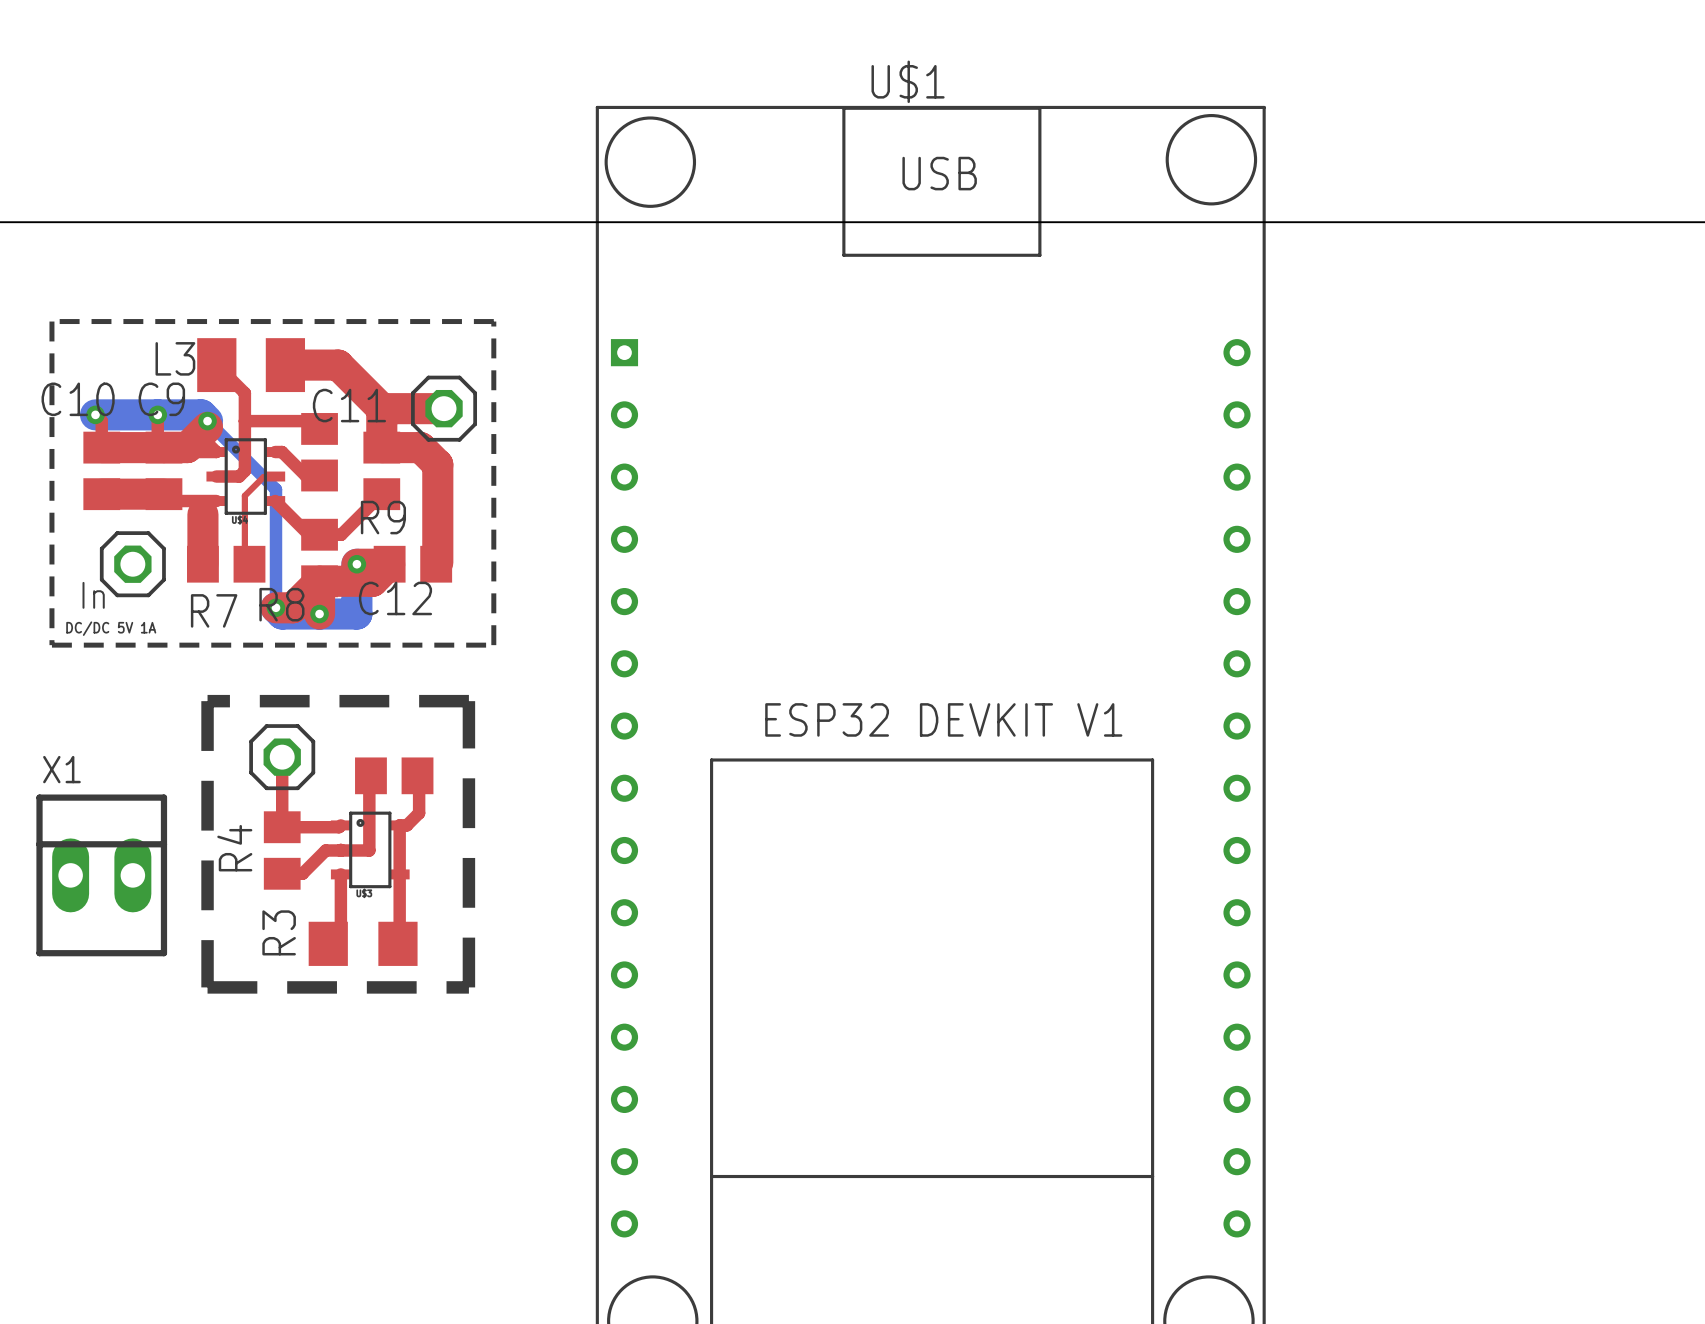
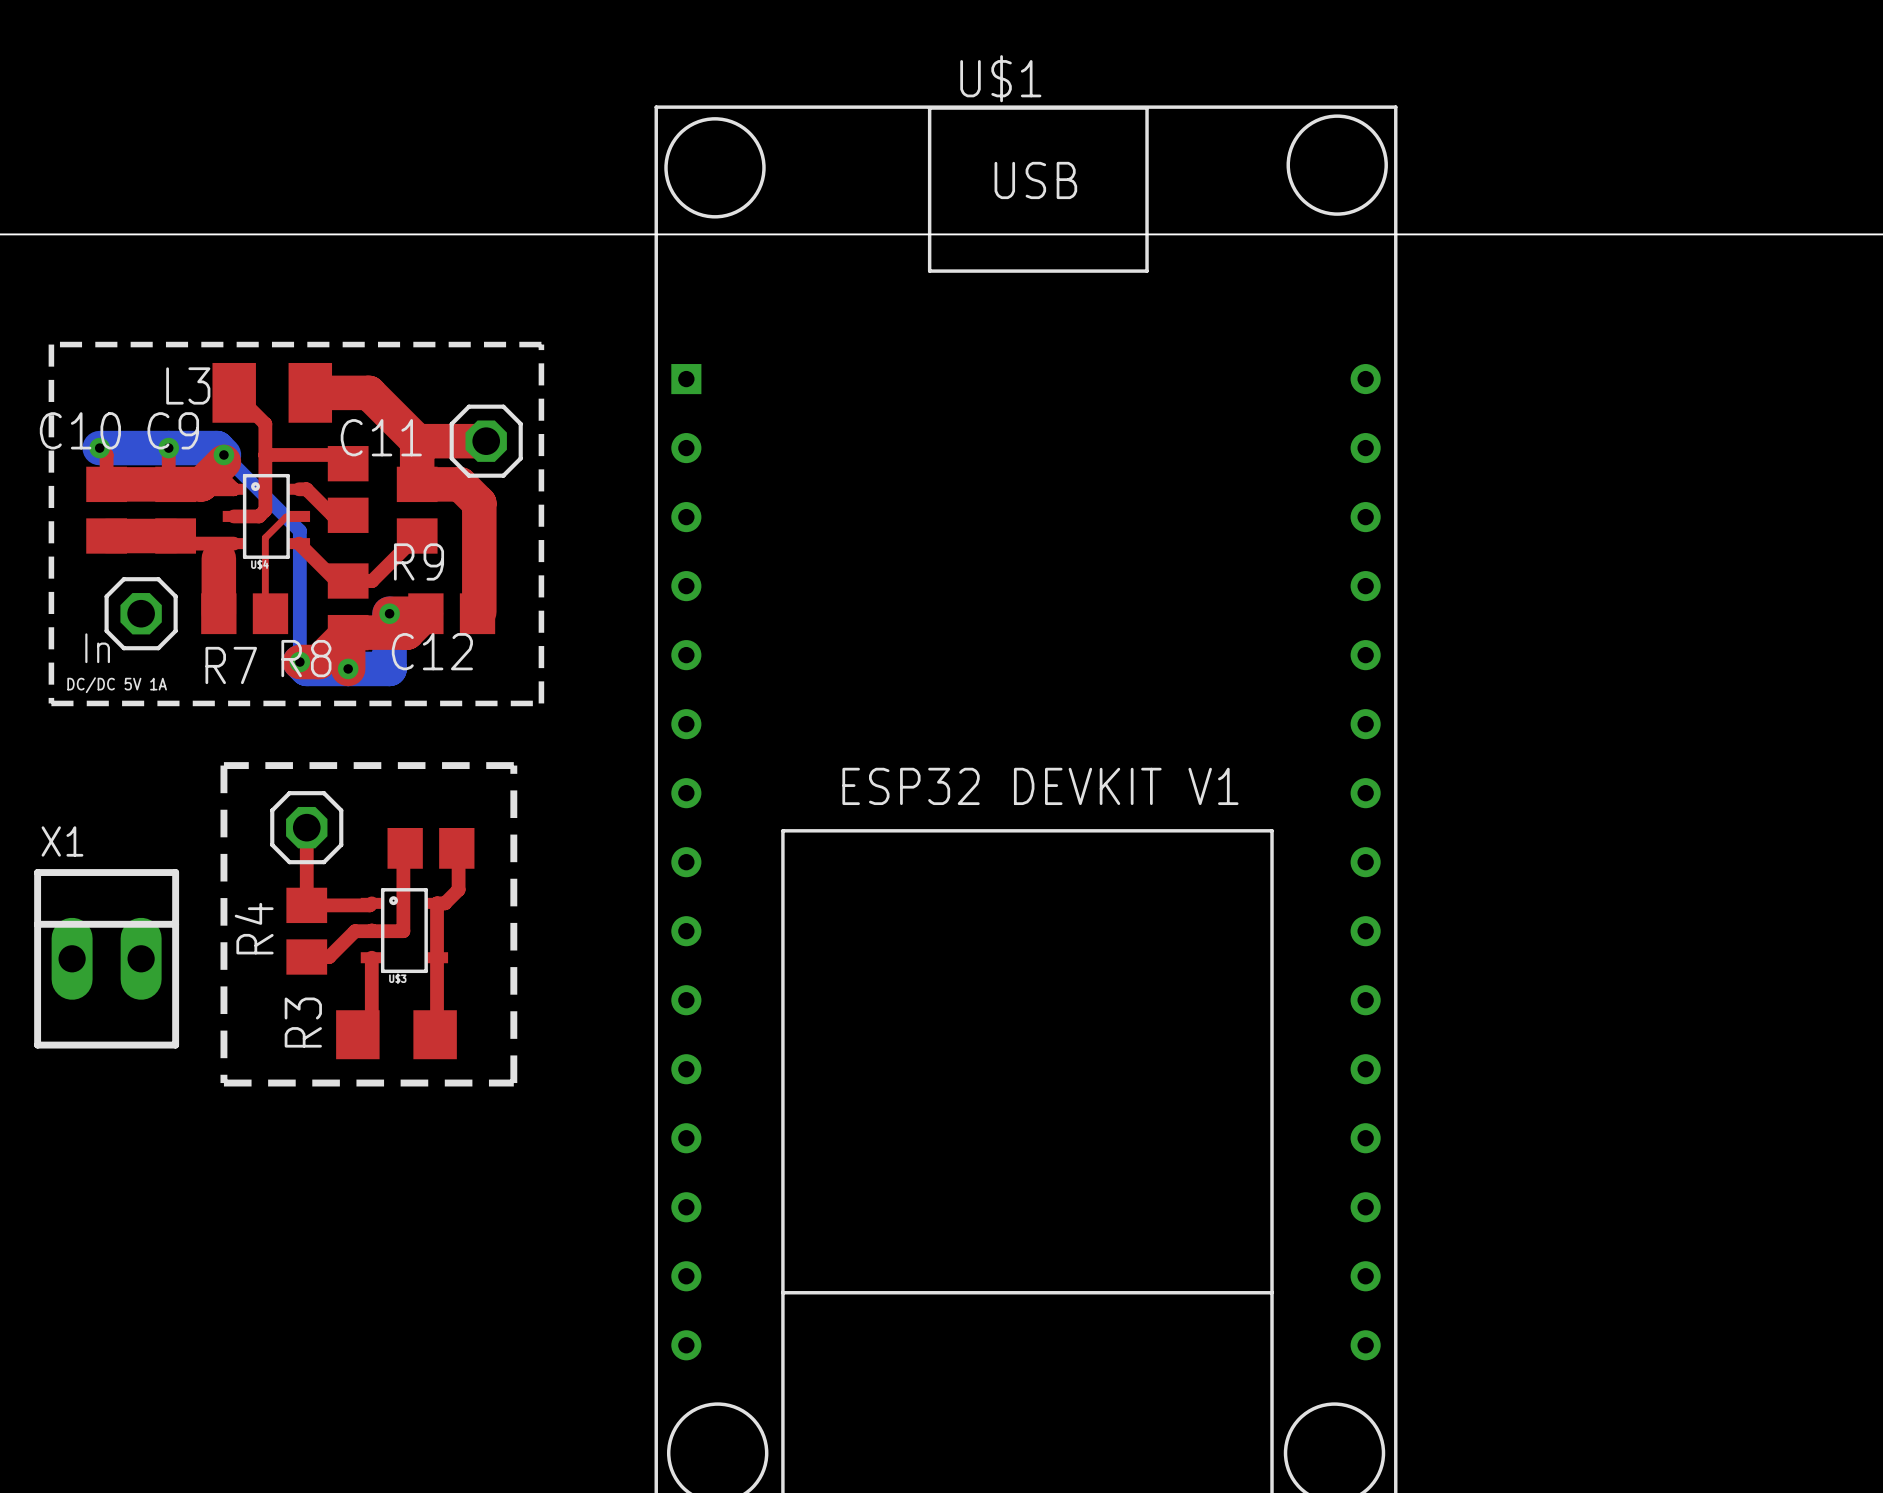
line width: thick (207, 701) (207, 987) (468, 987) (468, 701) (207, 701) -> thin (223, 765) (223, 1083) (513, 1083) (513, 765) (223, 765)

